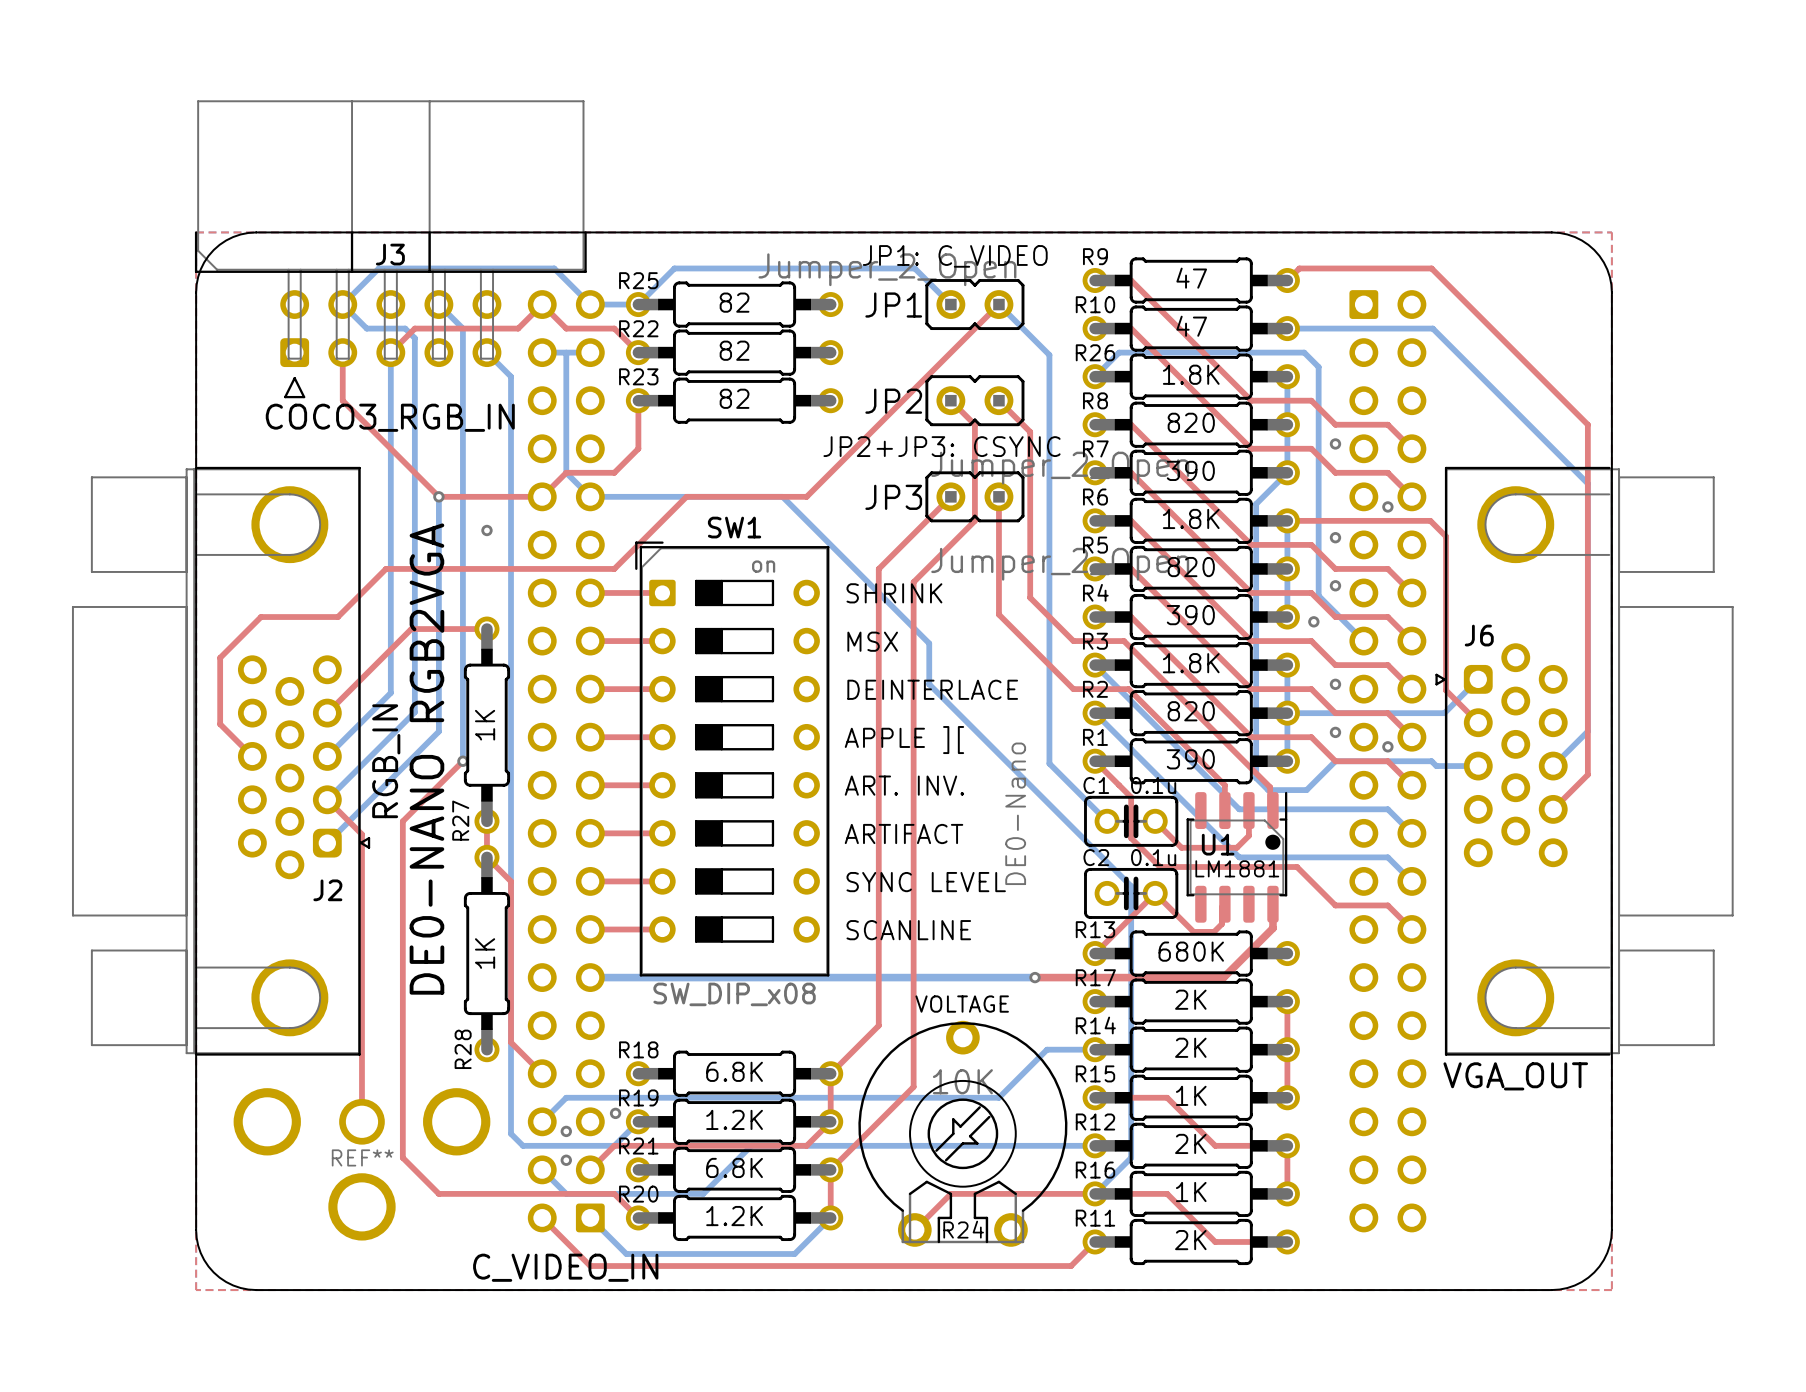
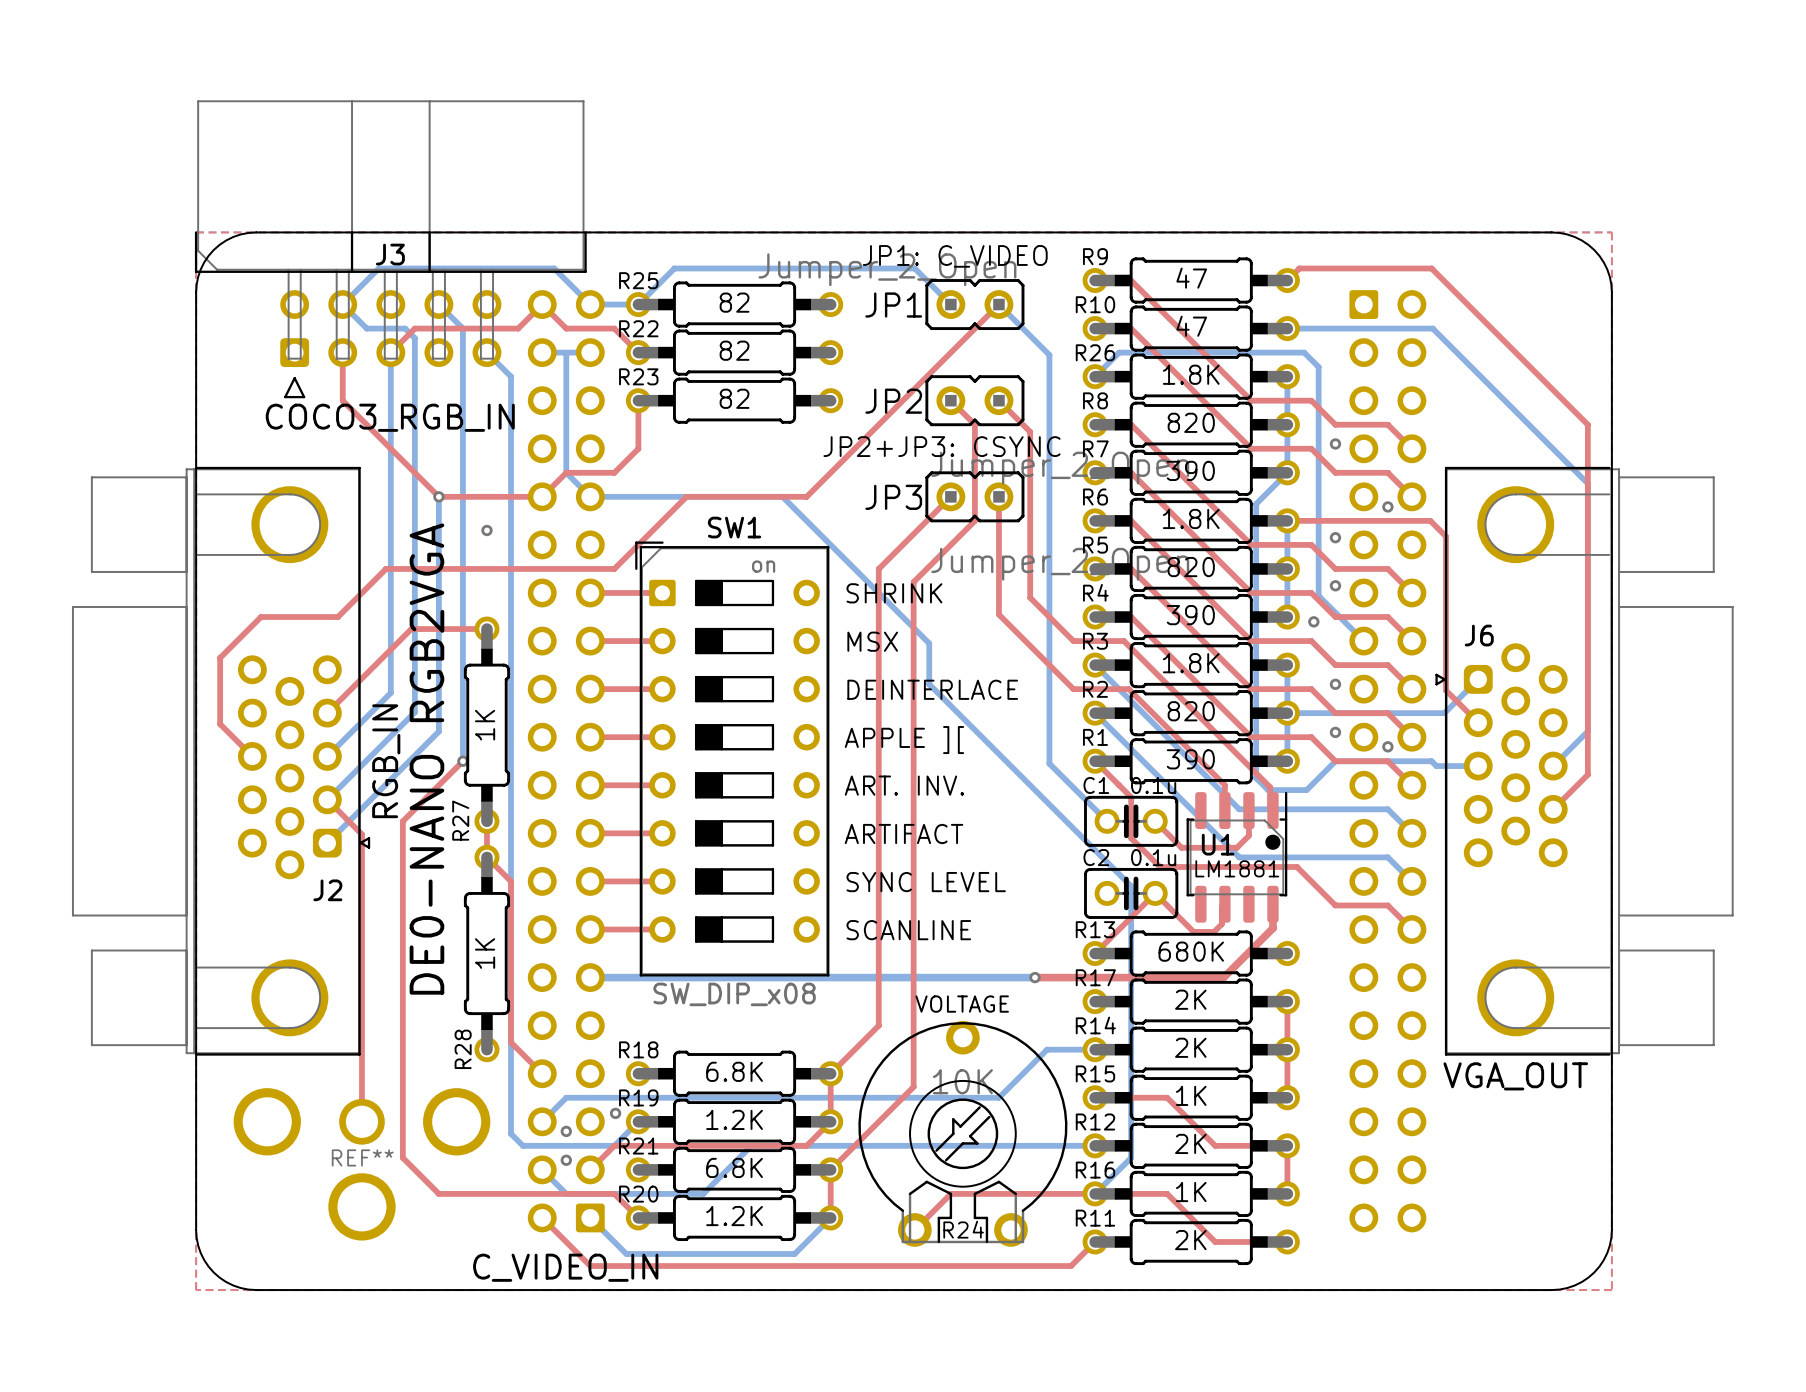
drawing: [1005, 742, 1027, 886] -> none

